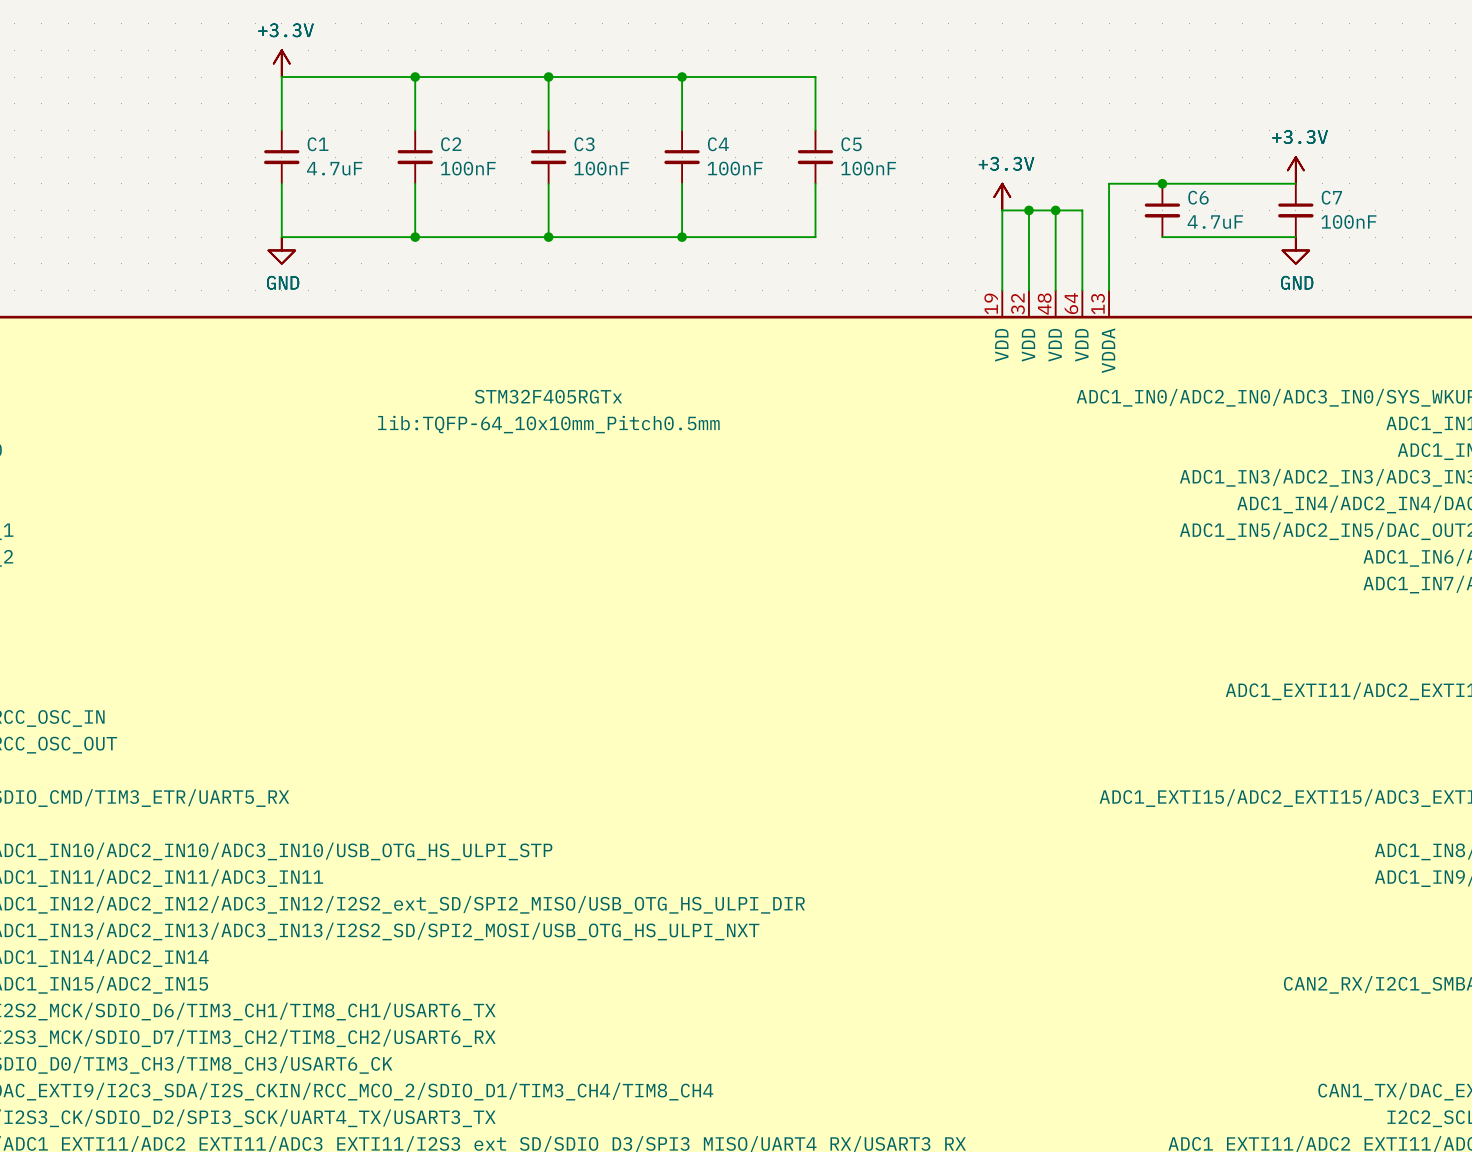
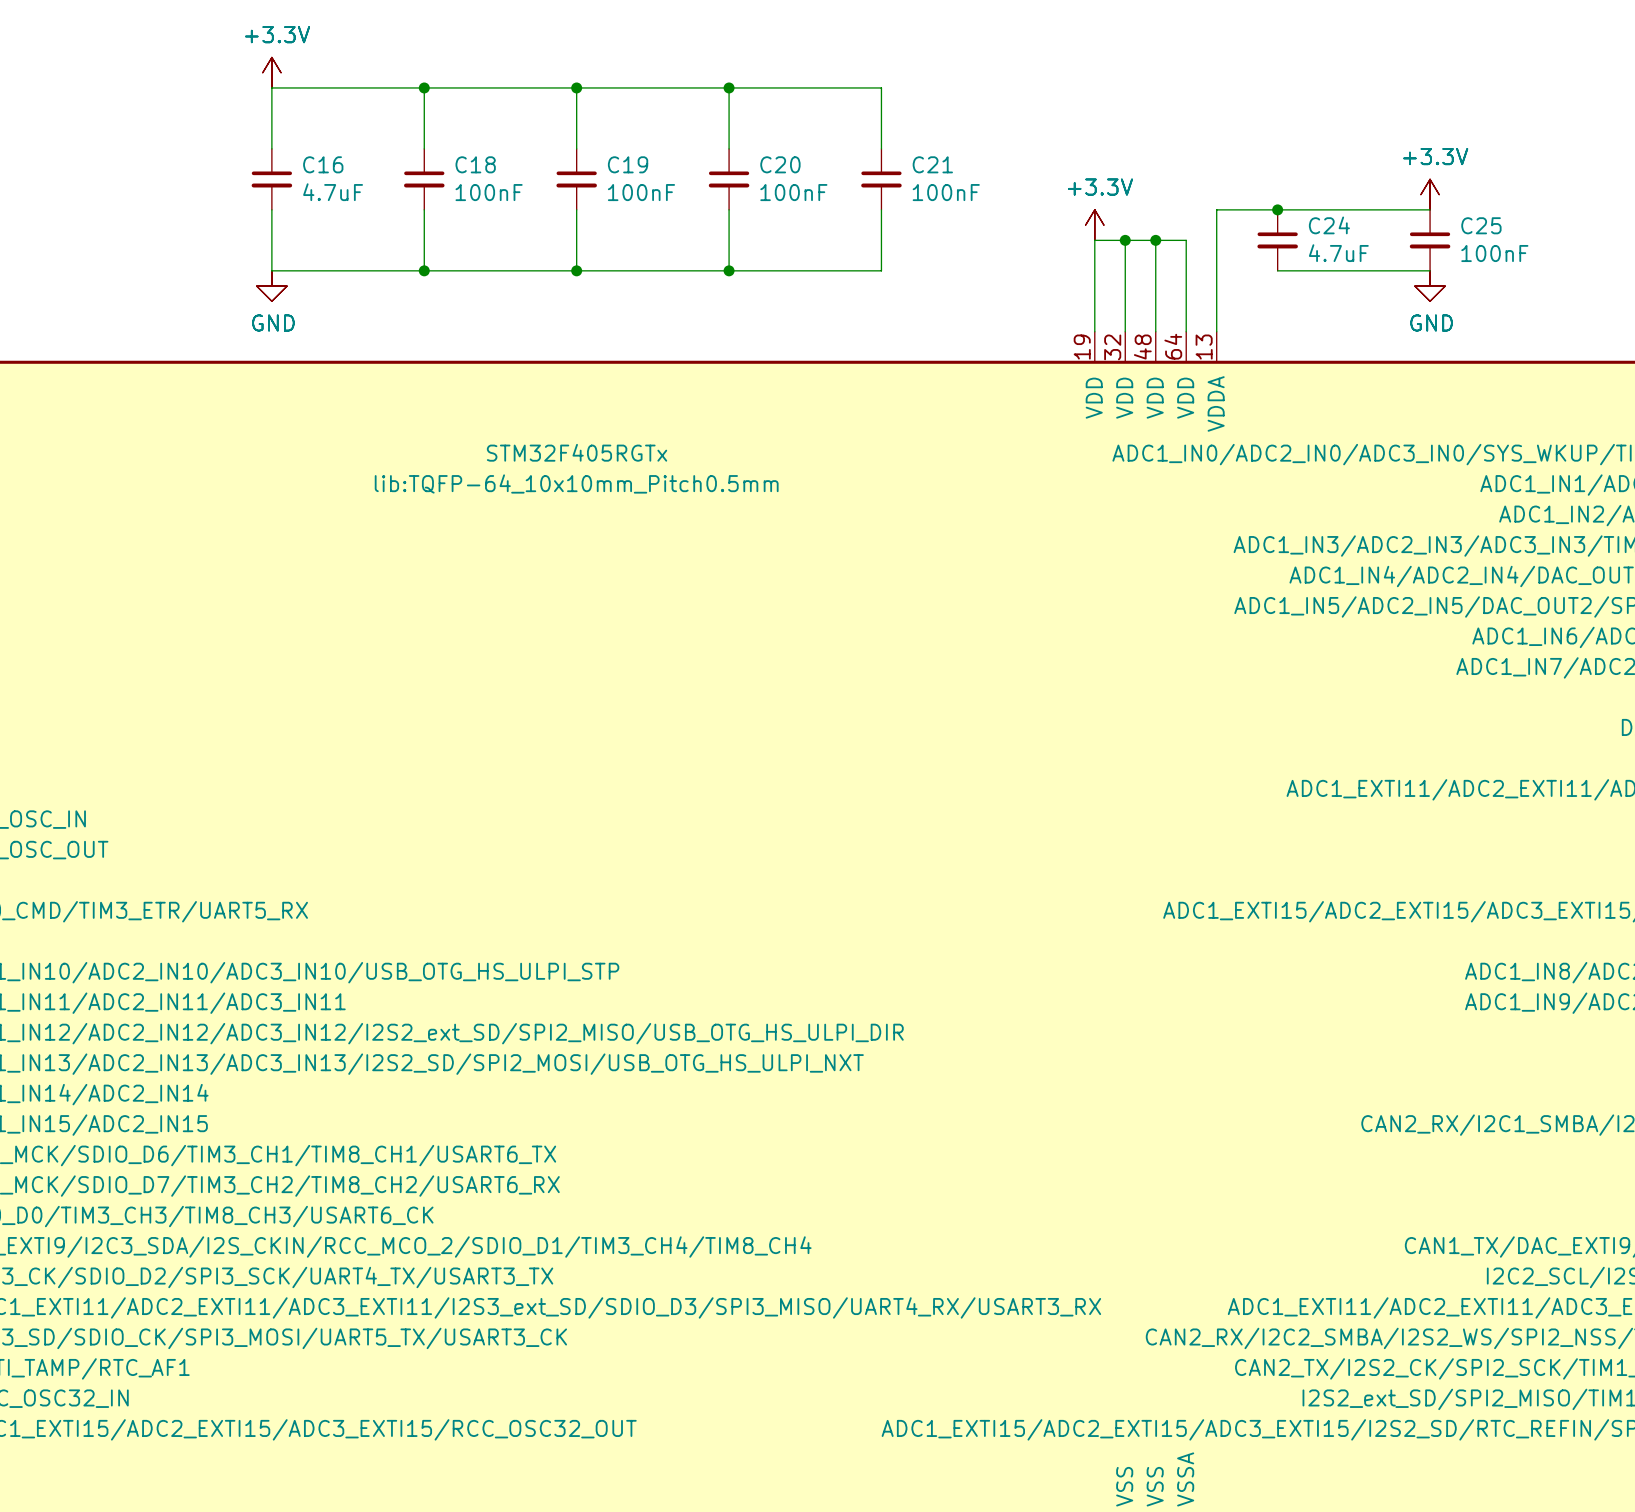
C1 name: C1 (318, 144) -> C16 (323, 164)
C2 name: C2 (451, 144) -> C18 (475, 164)
C3 name: C3 (584, 144) -> C19 (628, 164)
C4 name: C4 (718, 144) -> C20 (780, 164)
C5 name: C5 (851, 144) -> C21 (932, 164)
C6 name: C6 (1198, 197) -> C24 (1329, 225)
C7 name: C7 (1331, 197) -> C25 (1481, 225)

